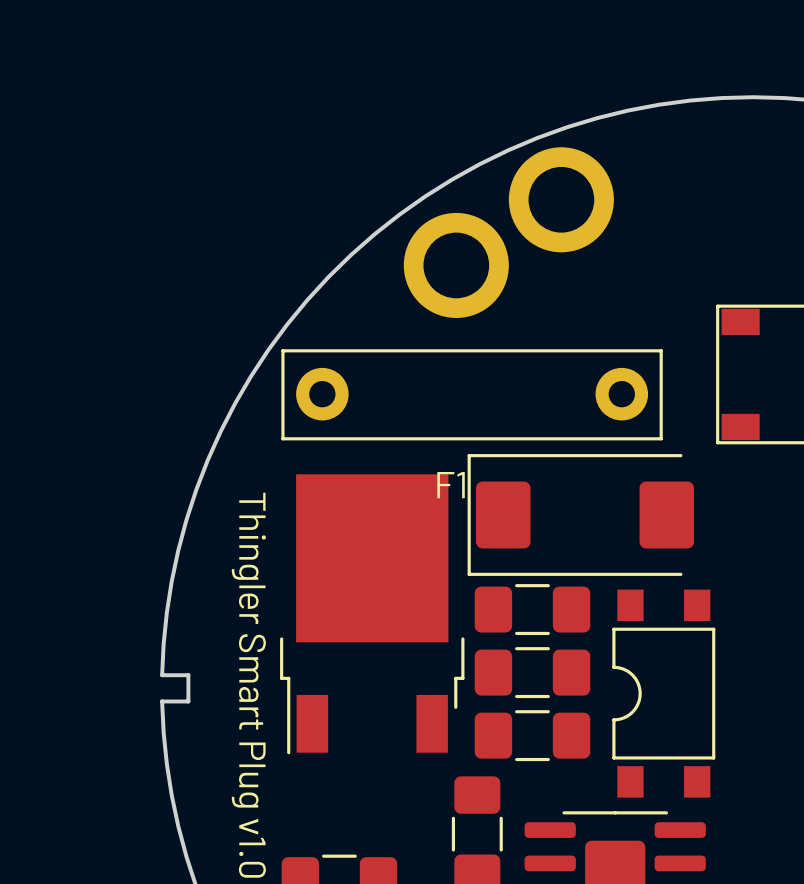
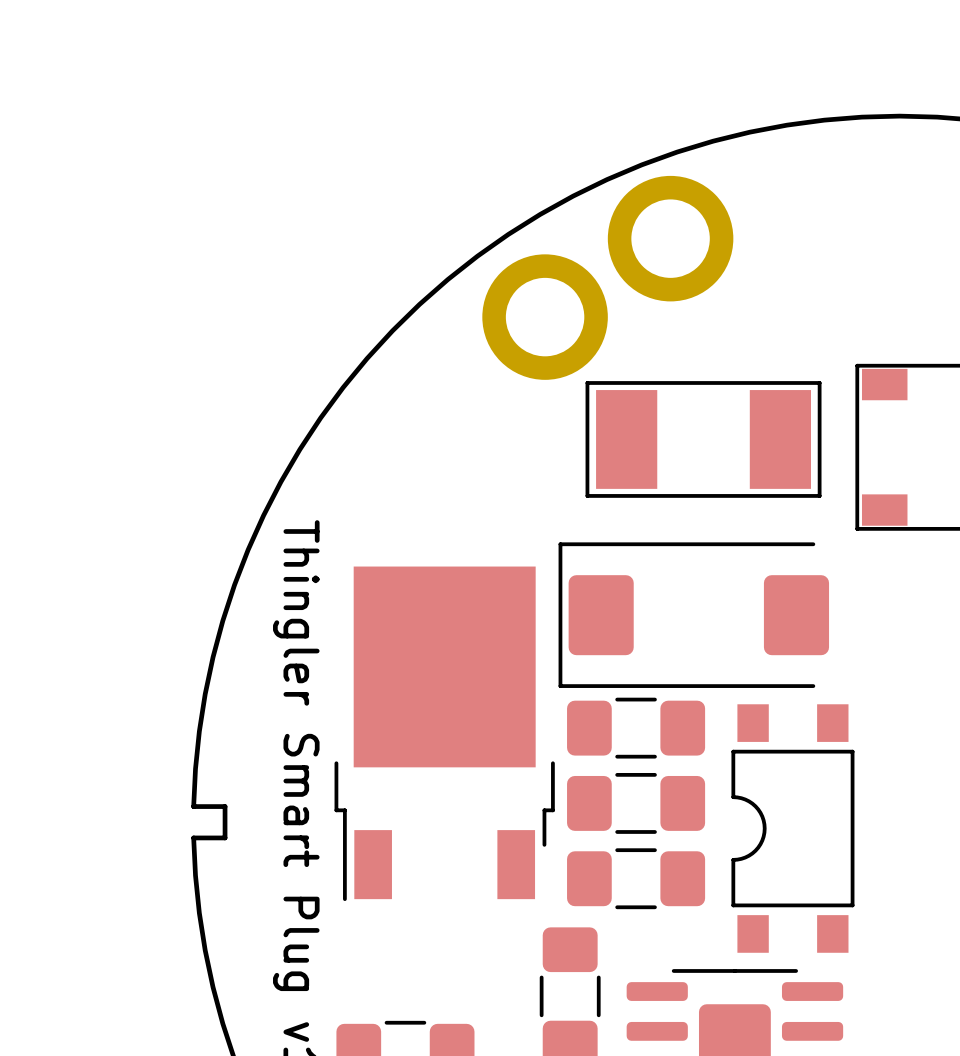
part: none -> (703, 439)
F1: (472, 394) -> none

